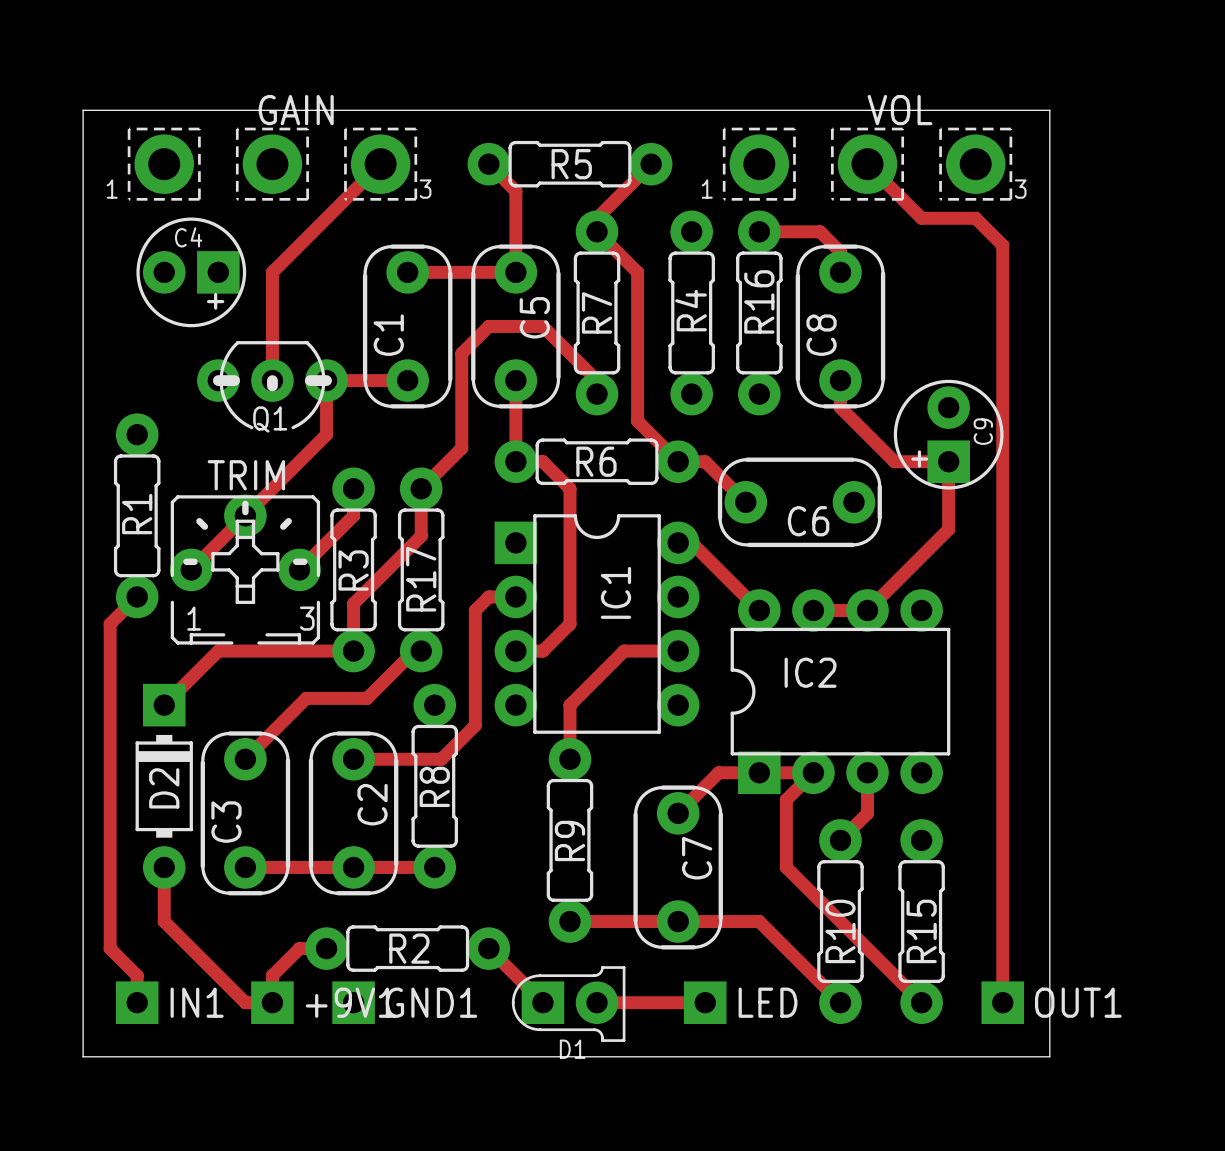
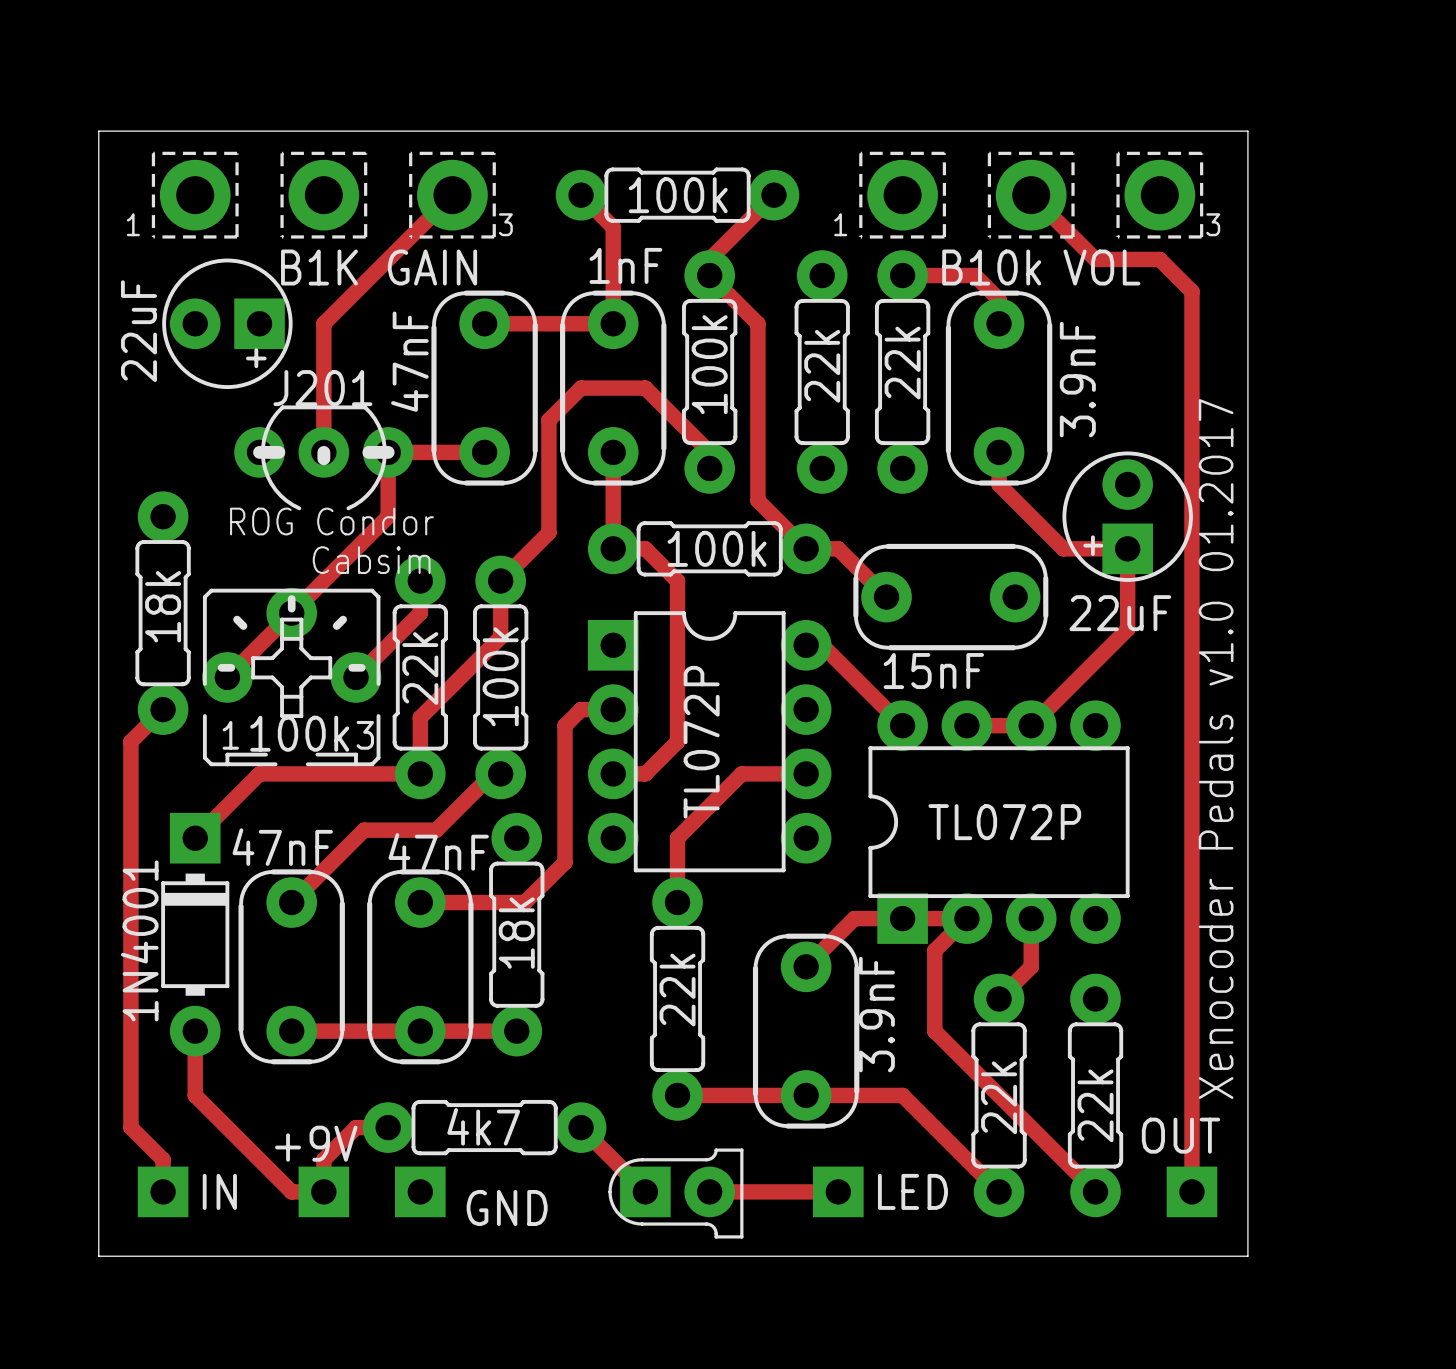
GAIN name position: GAIN (296, 110) -> GAIN (432, 267)
VOL name position: VOL (899, 110) -> VOL (1101, 267)
R5 value: none -> 100k (678, 195)
R5 name: R5 (571, 164) -> none
C5 value: none -> 1nF (625, 265)
GAIN value: none -> B1K (319, 267)
VOL value: none -> B10k (991, 267)
C4 name: C4 (188, 237) -> none
C4 value: none -> 22uF (138, 331)
R16 name: R16 (759, 301) -> none
C1 value: none -> 47nF (409, 361)
R16 value: none -> 22k (902, 363)
R7 value: none -> 100k (709, 364)
R4 value: none -> 22k (822, 366)
R4 name: R4 (691, 310) -> none
R7 name: R7 (597, 312) -> none
C5 name: C5 (534, 317) -> none
C8 value: none -> 3.9nF (1077, 379)
Q1 value: none -> J201 (322, 388)
C1 name: C1 (388, 335) -> none
C8 name: C8 (821, 335) -> none
Q1 name: Q1 (270, 419) -> none
C9 name: C9 (983, 431) -> none
text: none -> ROG Condor (331, 521)
R6 name: R6 (596, 461) -> none
R6 value: none -> 100k (717, 548)
text: none -> Cabsim (371, 560)
TRIM name: TRIM (246, 475) -> none
R1 value: none -> 18k (163, 606)
R1 name: R1 (137, 514) -> none
C9 value: none -> 22uF (1120, 613)
C6 name: C6 (808, 521) -> none
R3 value: none -> 22k (420, 668)
C6 value: none -> 15nF (933, 671)
R17 value: none -> 100k (500, 676)
R3 name: R3 (353, 570) -> none
R17 name: R17 (421, 579) -> none
IC1 name: IC1 (615, 592) -> none
TRIM value: none -> 100k (299, 733)
IC1 value: none -> TL072P (701, 742)
text: none -> Xenocoder Pedals v1.0 01.2017 (1216, 749)
IC2 name: IC2 (810, 672) -> none
IC2 value: none -> TL072P (1004, 822)
C3 value: none -> 47nF (282, 847)
C2 value: none -> 47nF (438, 851)
R8 value: none -> 18k (516, 933)
R8 name: R8 (434, 786) -> none
D2 name: D2 (164, 788) -> none
D2 value: none -> 1N4001 (139, 940)
C2 name: C2 (372, 804) -> none
C3 name: C3 (226, 822) -> none
R9 value: none -> 22k (677, 990)
R9 name: R9 (569, 840) -> none
C7 value: none -> 3.9nF (876, 1014)
C7 name: C7 (697, 858) -> none
R10 value: none -> 22k (999, 1097)
R15 value: none -> 22k (1095, 1105)
R10 name: R10 (840, 931) -> none
R15 name: R15 (921, 931) -> none
R2 value: none -> 4k7 (483, 1126)
R2 name: R2 (409, 948) -> none
IN1 name: IN1 (197, 1002) -> IN (219, 1191)
+9V1 name: +9V1 (350, 1002) -> +9V (316, 1143)
GND1 name: GND1 (431, 1002) -> GND (507, 1207)
OUT1 name: OUT1 (1078, 1002) -> OUT (1180, 1135)
D1 name: D1 (572, 1049) -> none

